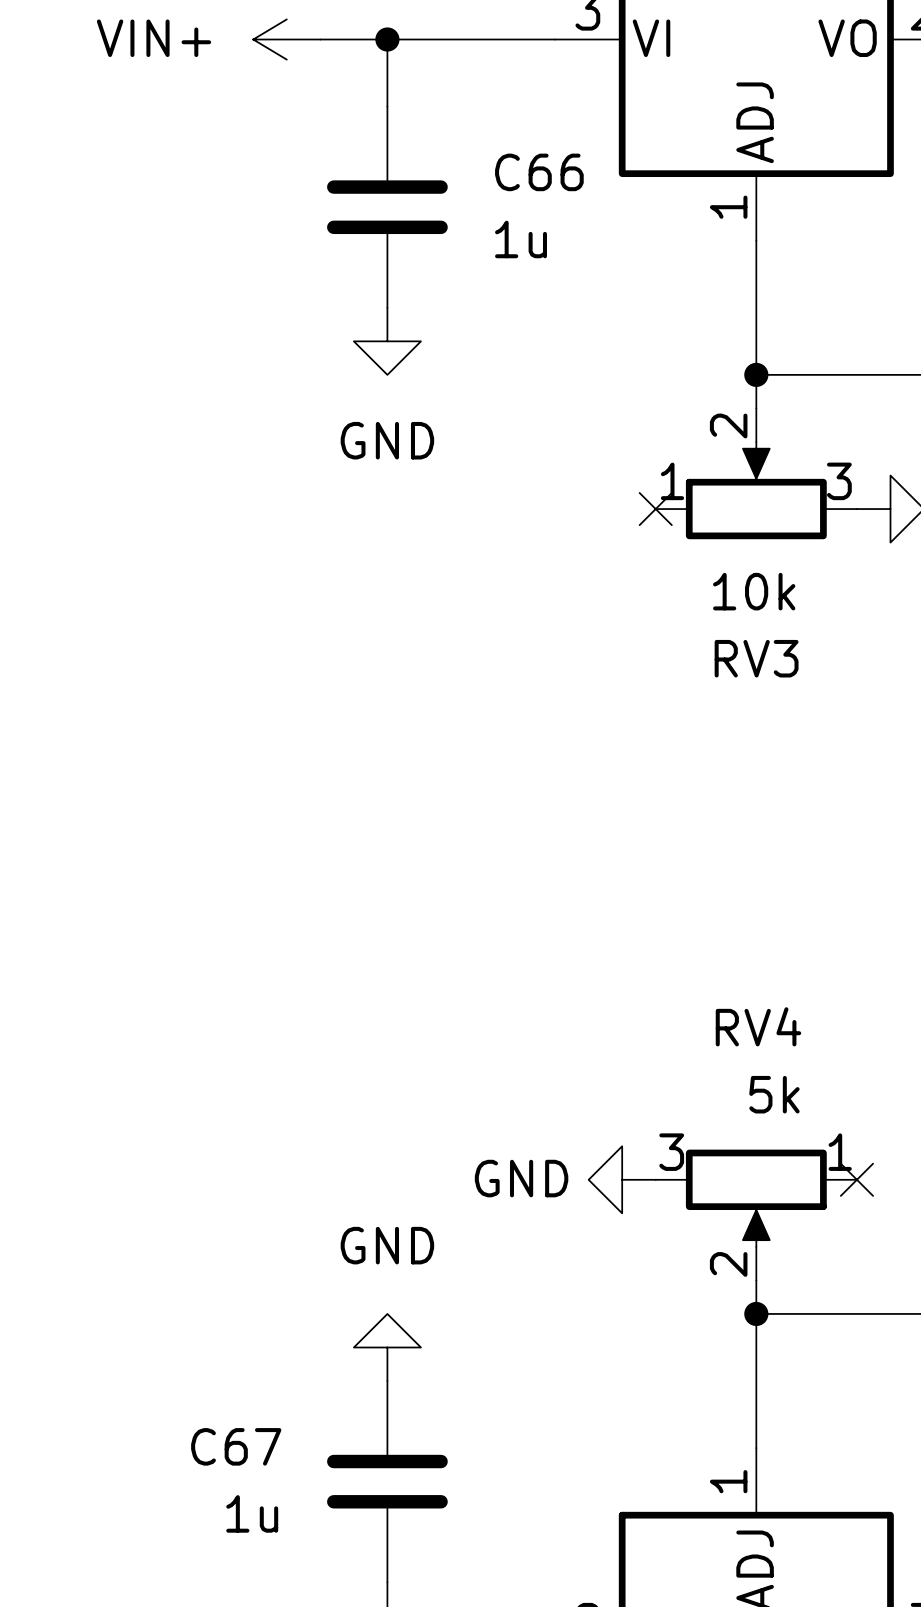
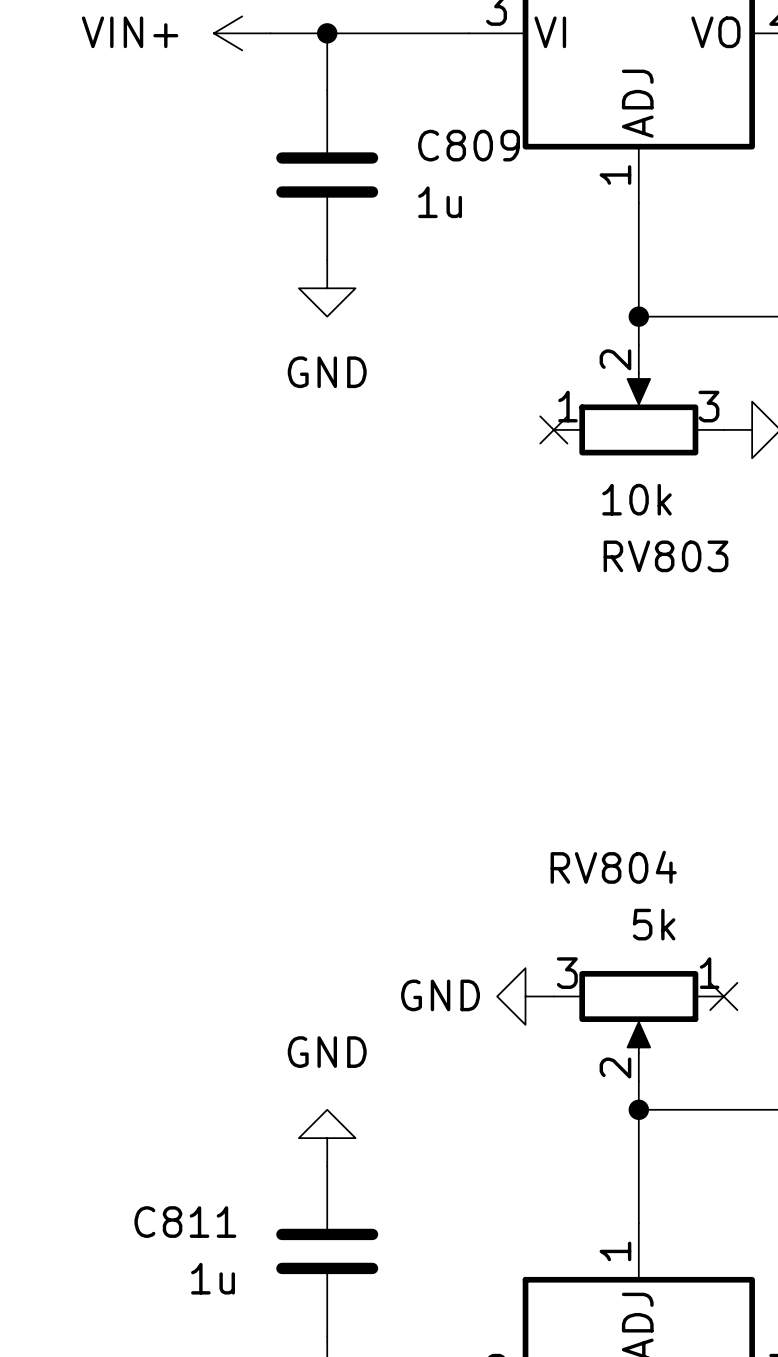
C66 name: C66 (539, 172) -> C809 (469, 145)
RV3 name: RV3 (756, 658) -> RV803 (666, 556)
RV4 name: RV4 (758, 1026) -> RV804 (613, 867)
C67 name: C67 (236, 1446) -> C811 (185, 1222)

